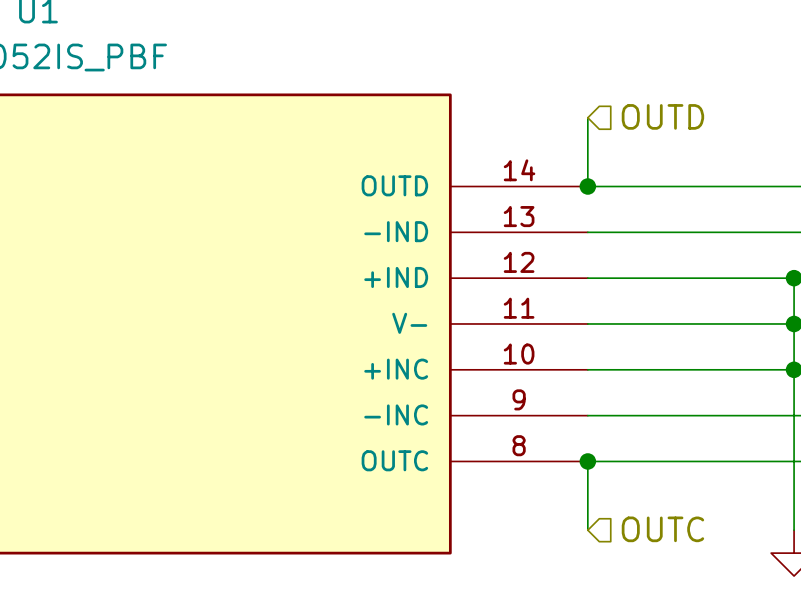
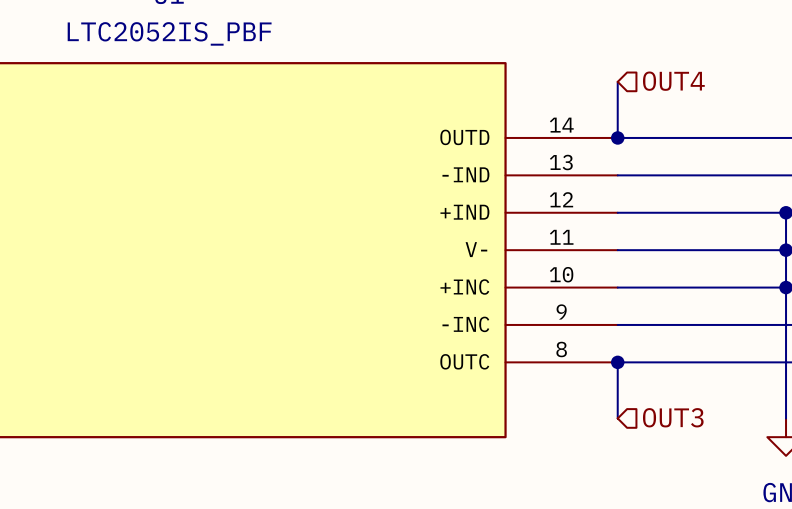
hierarchical label: OUTD (662, 116) -> OUT4 (673, 81)
hierarchical label: OUTC (662, 529) -> OUT3 (673, 417)

